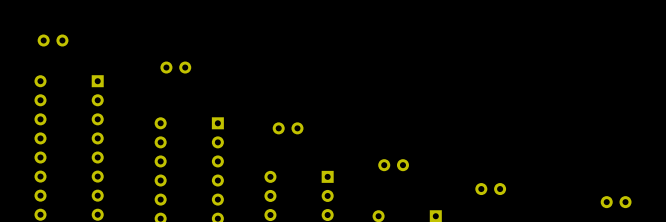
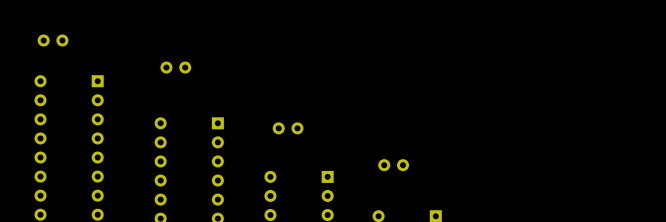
part: (490, 189) -> none
part: (616, 202) -> none

